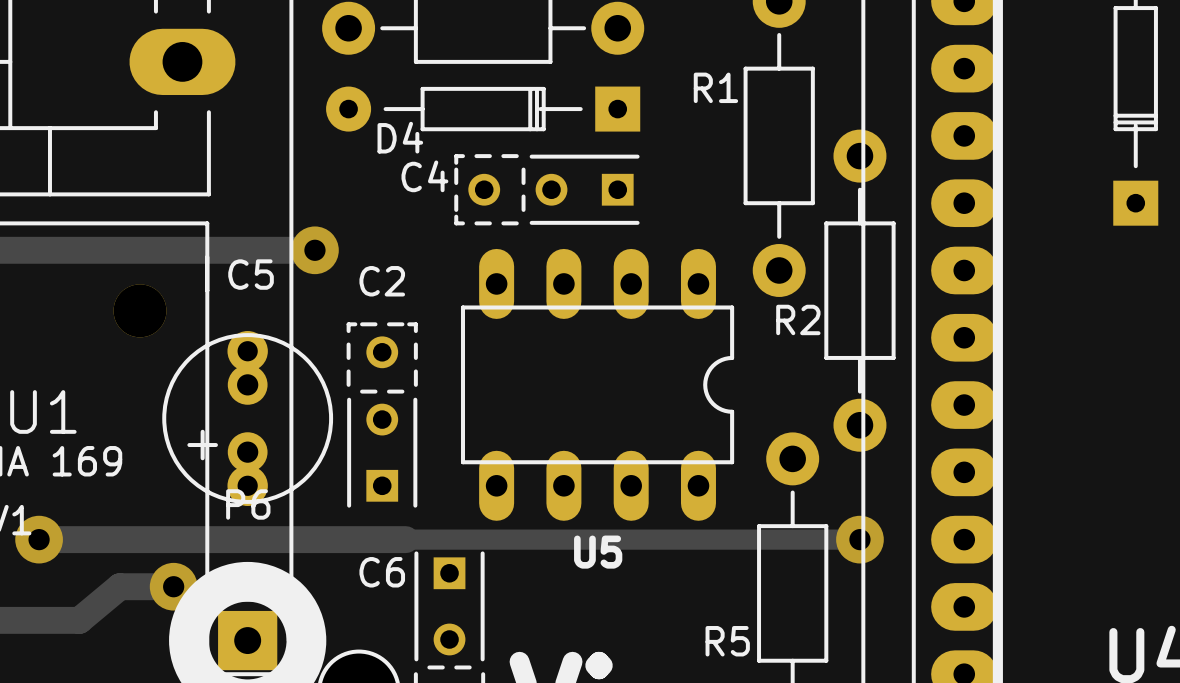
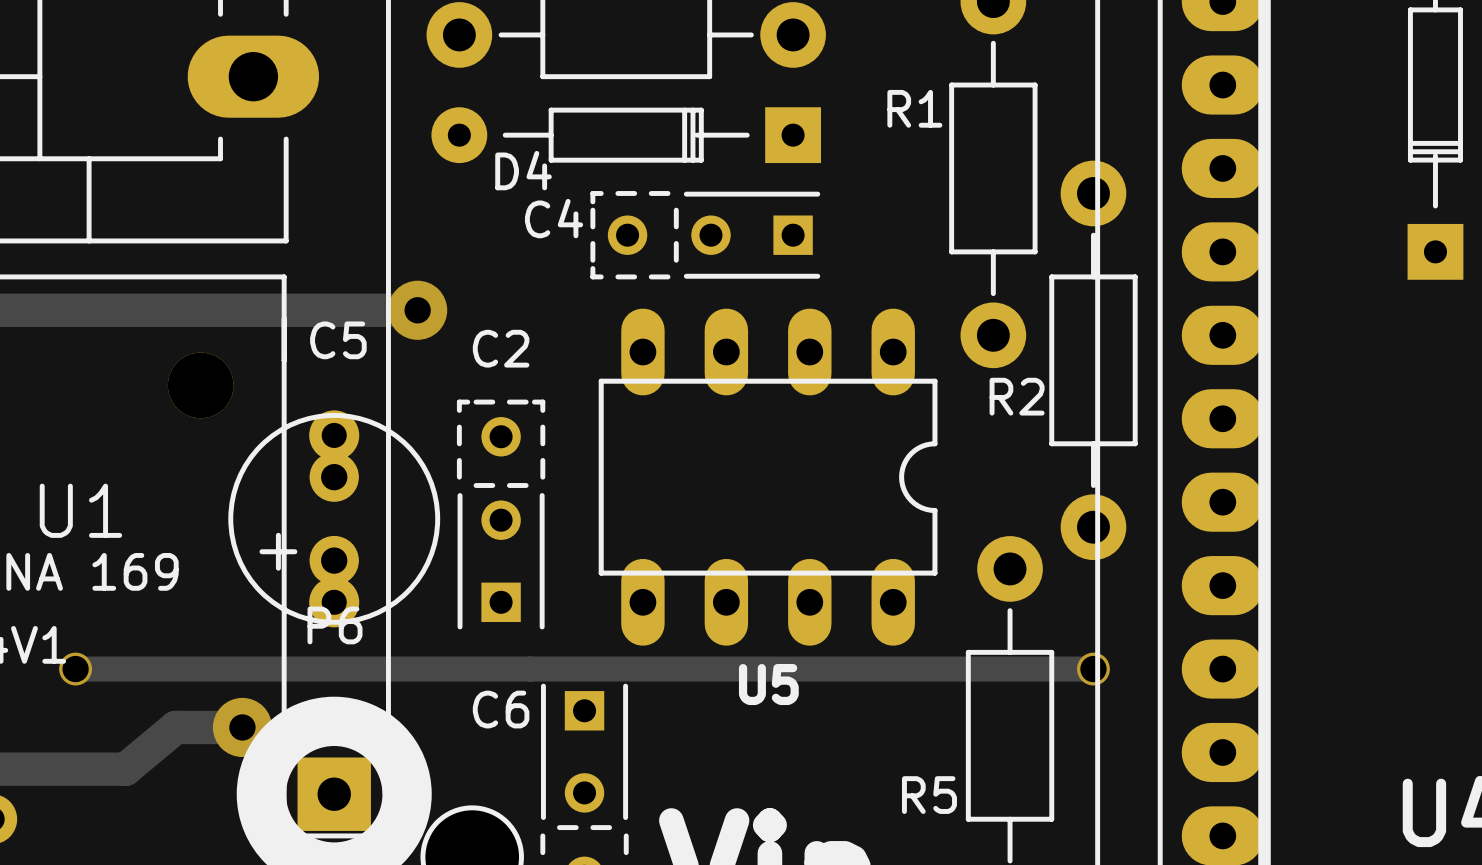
via size: [15, 515, 63, 564] -> [59, 652, 93, 686]
via size: [836, 515, 884, 564] -> [1077, 652, 1110, 686]
track width: thick (39, 539) (405, 539) -> thin (75, 669) (530, 669)

